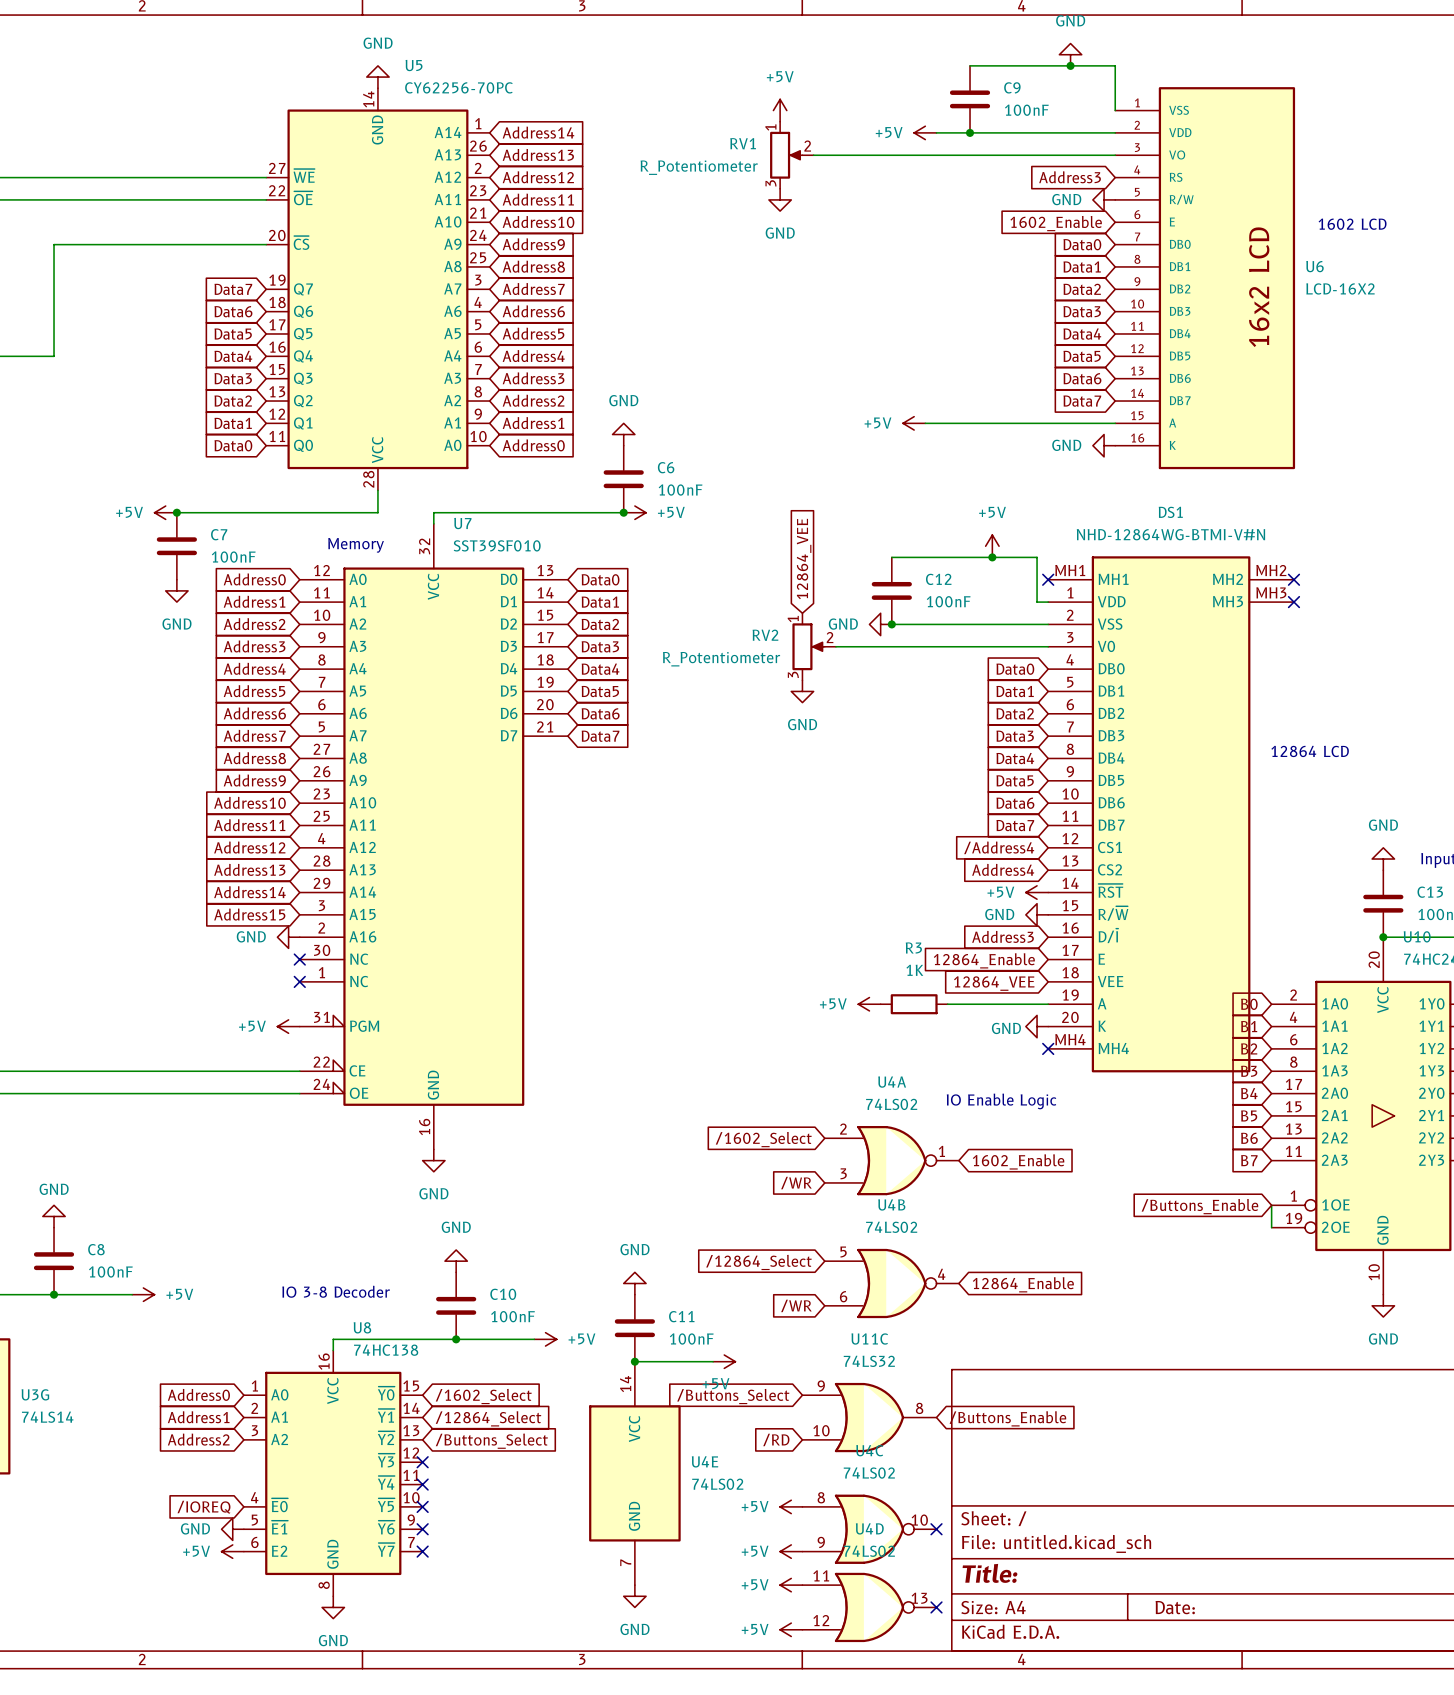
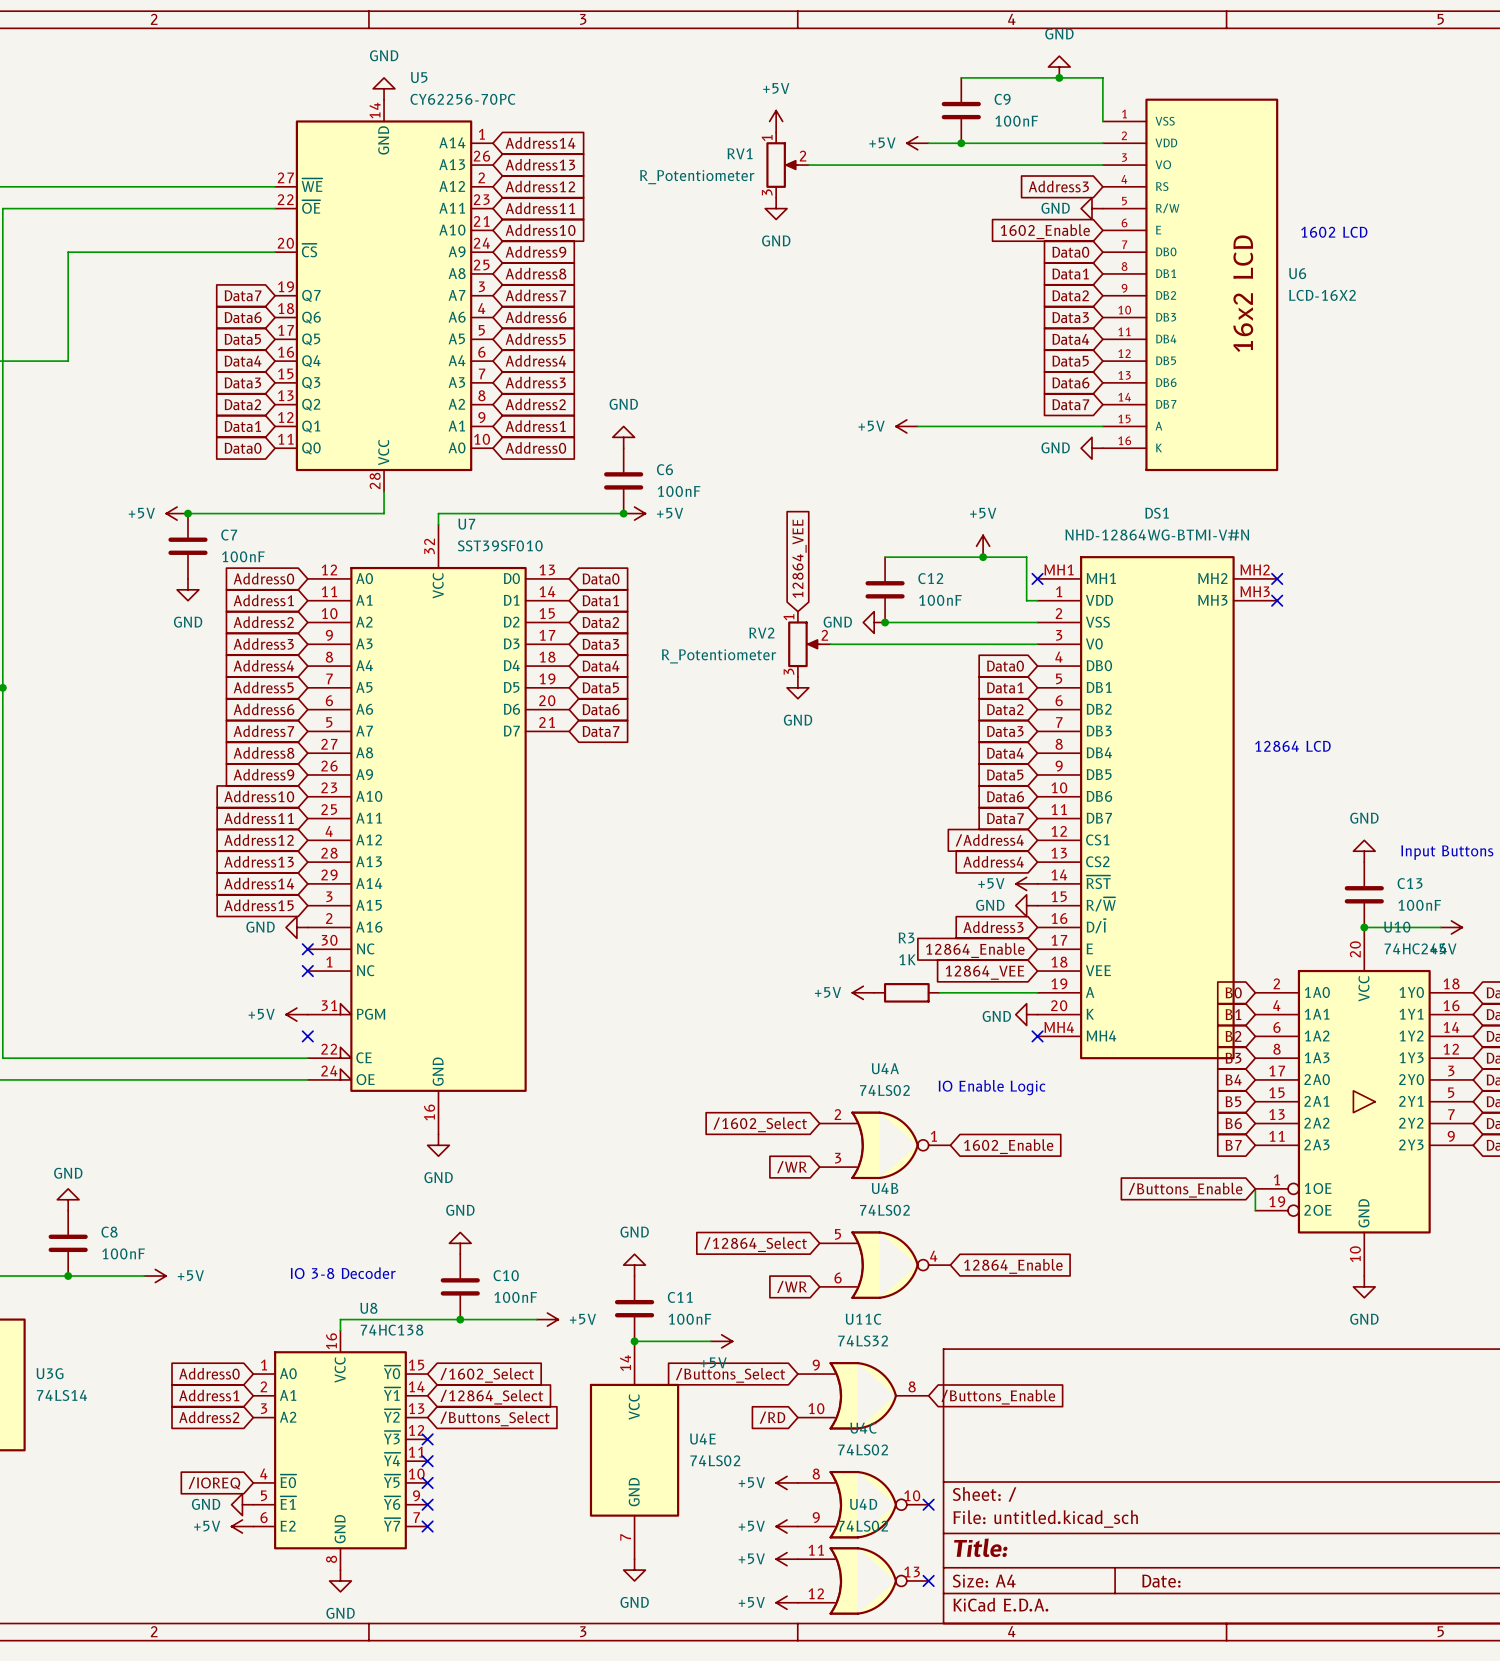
text: Memory (356, 545) -> none
no-connect mark: none -> (307, 1036)

